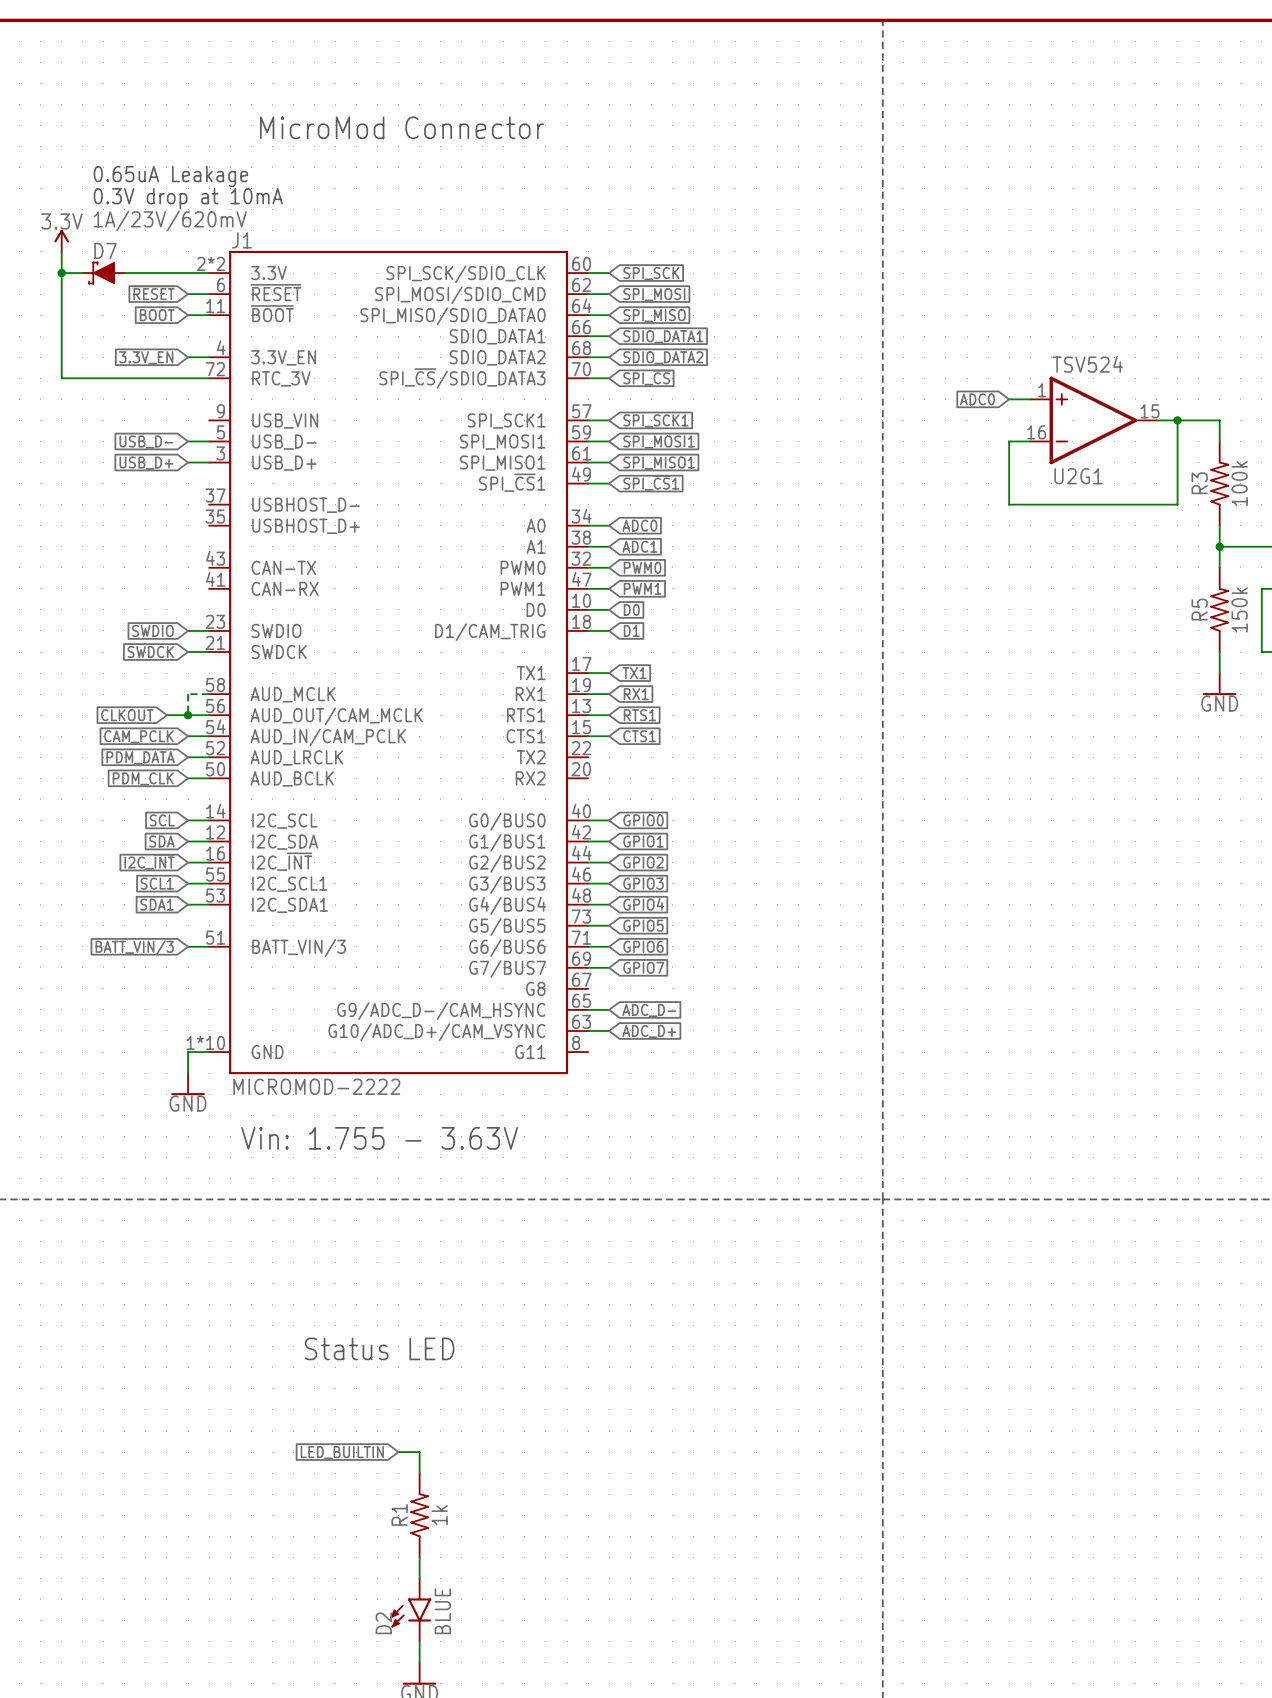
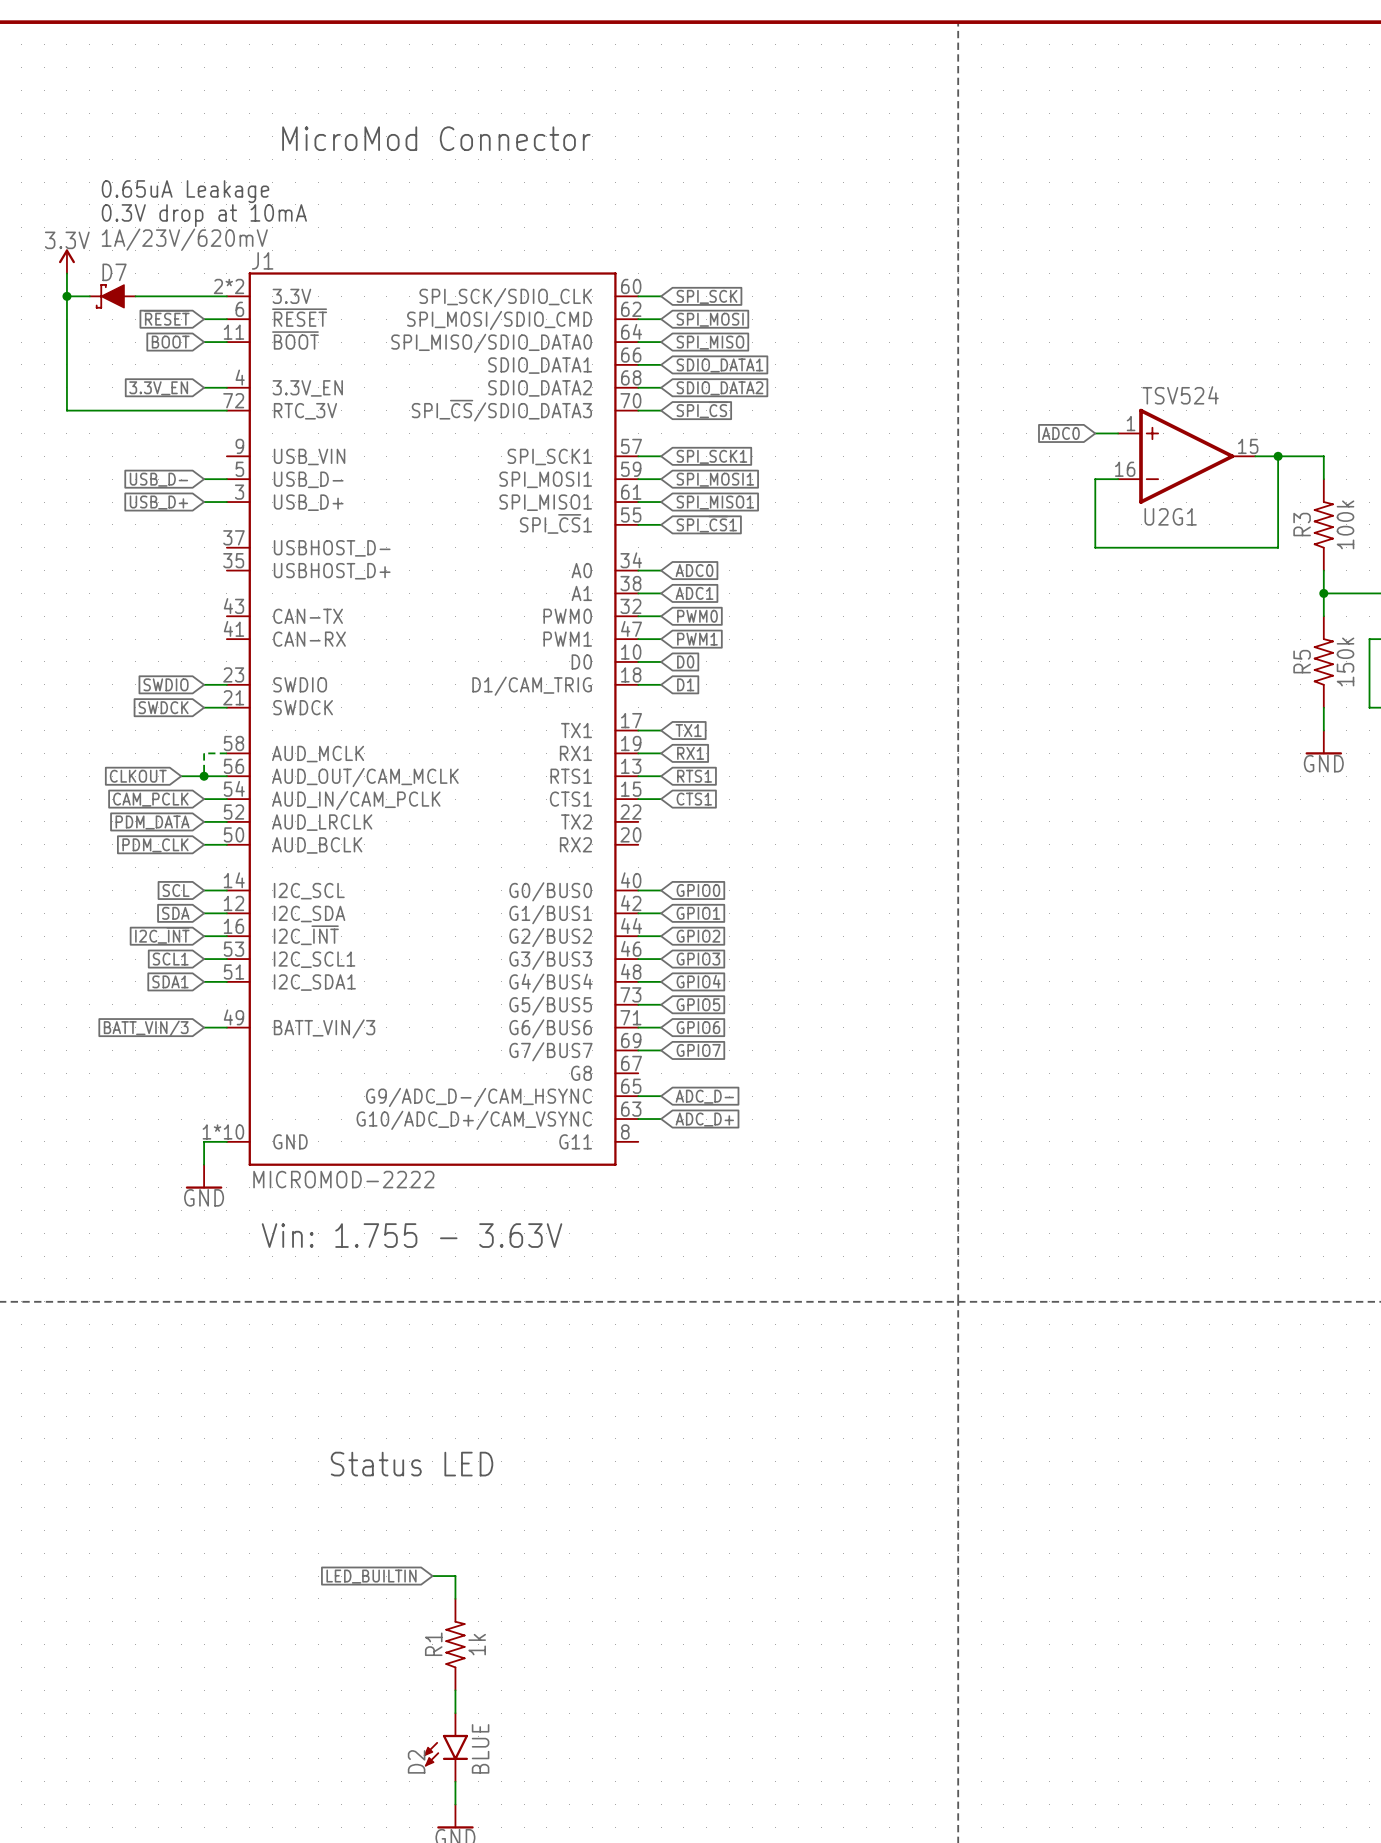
J1 pin number: 49 (581, 474) -> 55 (631, 514)
J1 pin number: 55 (215, 874) -> 53 (233, 949)
J1 pin number: 53 (215, 895) -> 51 (233, 972)
J1 pin number: 51 (215, 937) -> 49 (233, 1017)

